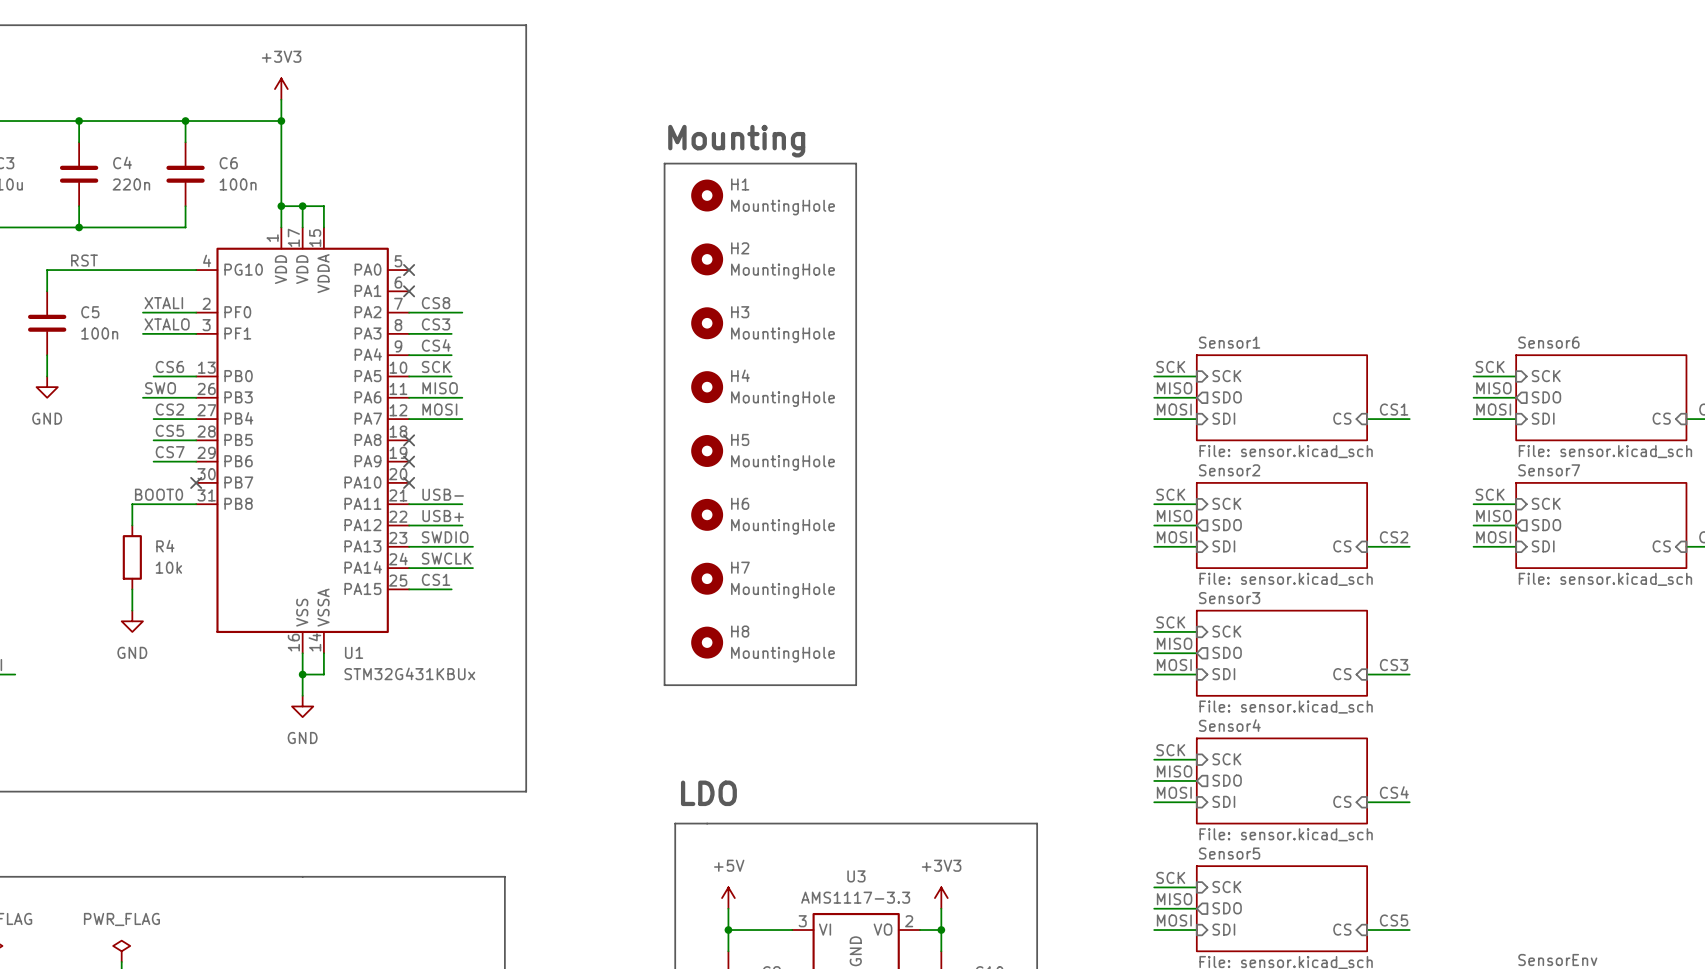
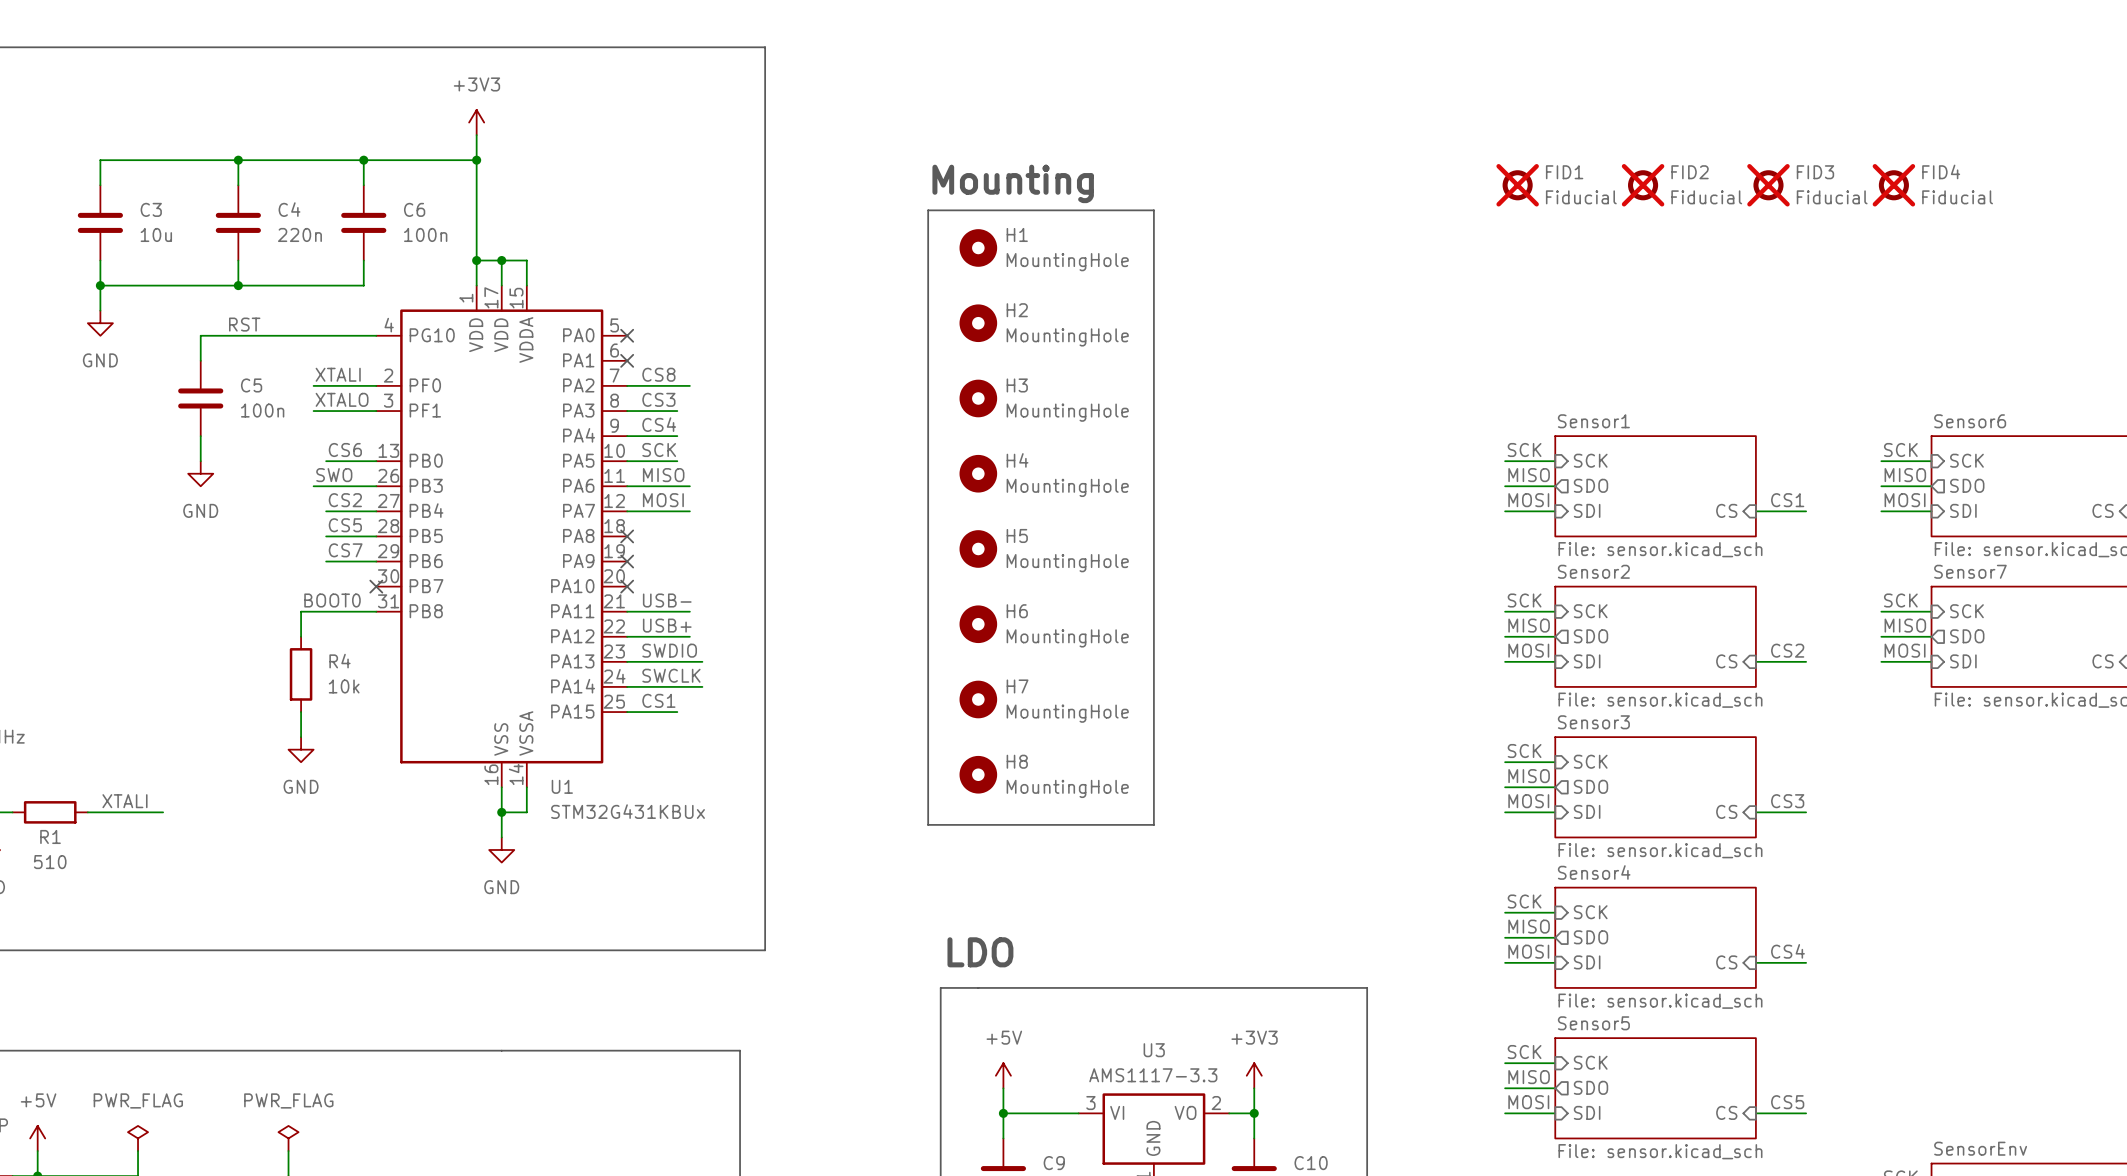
FID1: none -> Fiducial (1517, 185)
FID2: none -> Fiducial (1643, 185)
FID3: none -> Fiducial (1768, 185)
FID4: none -> Fiducial (1893, 185)

